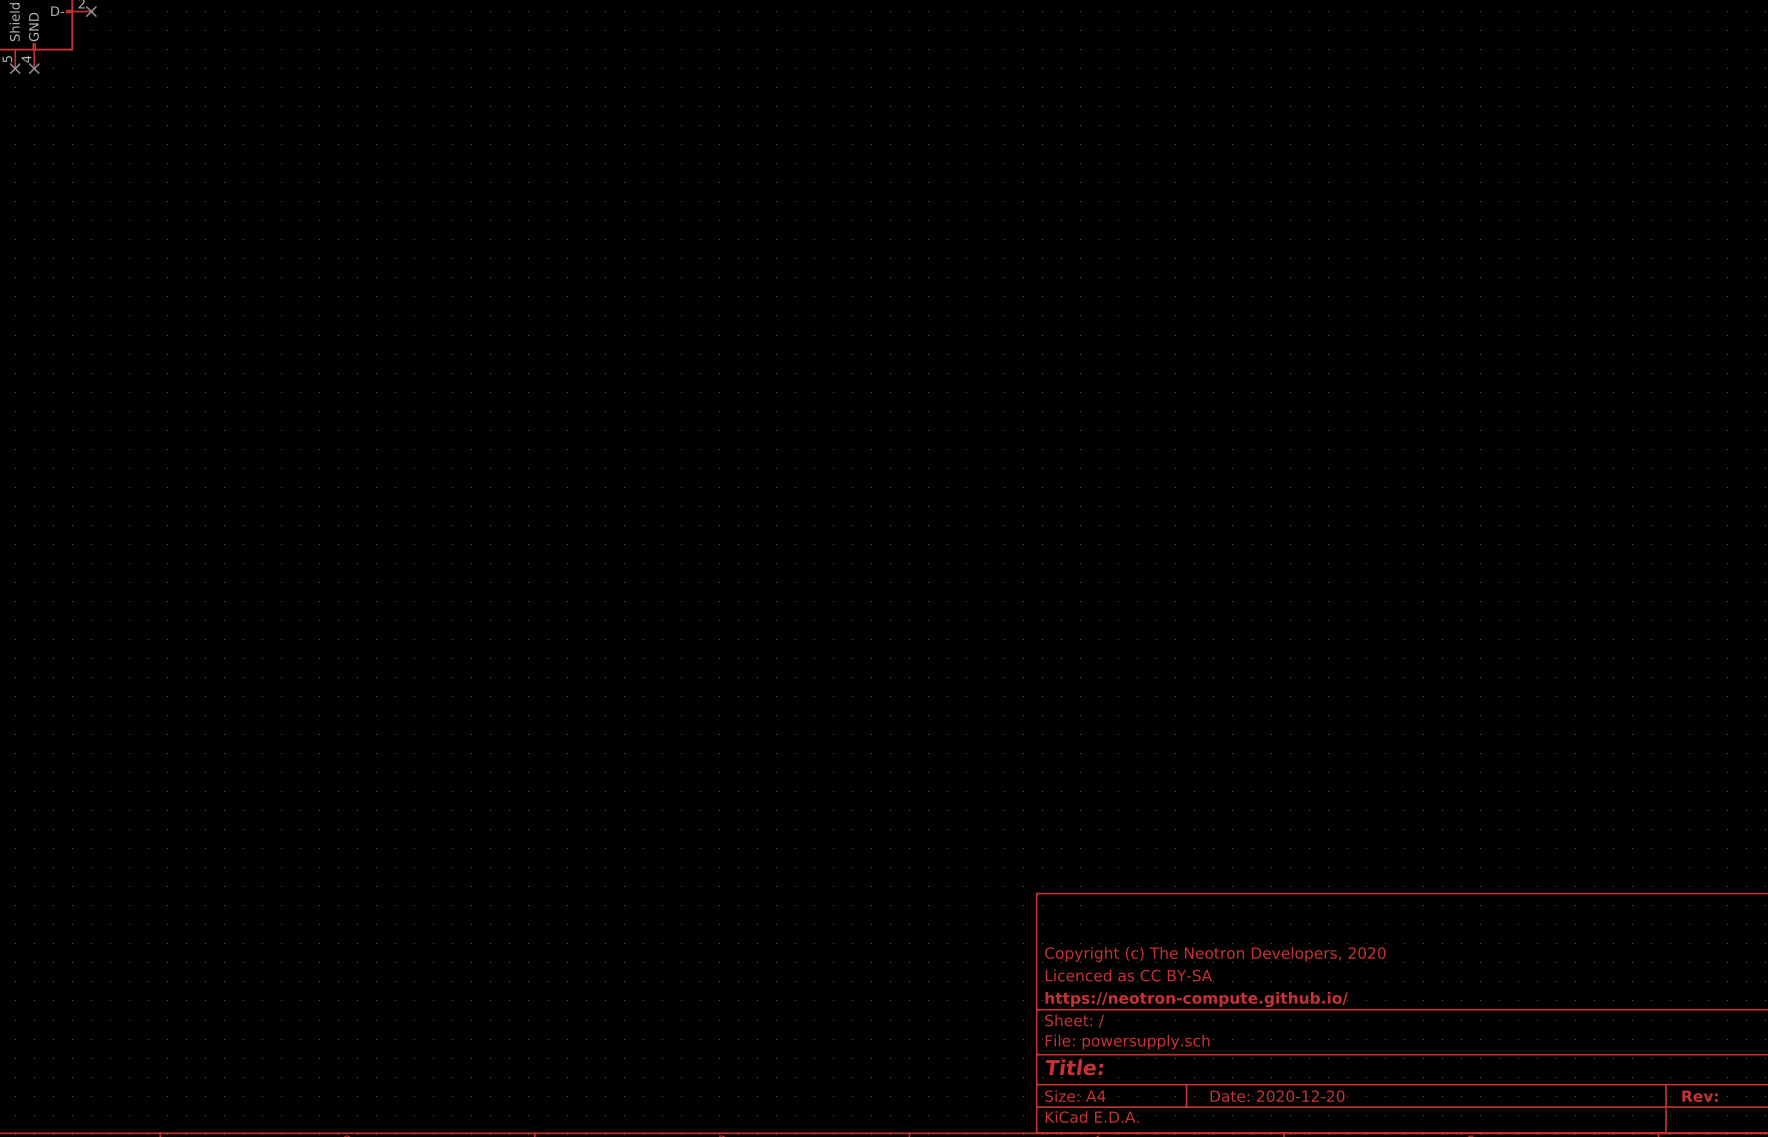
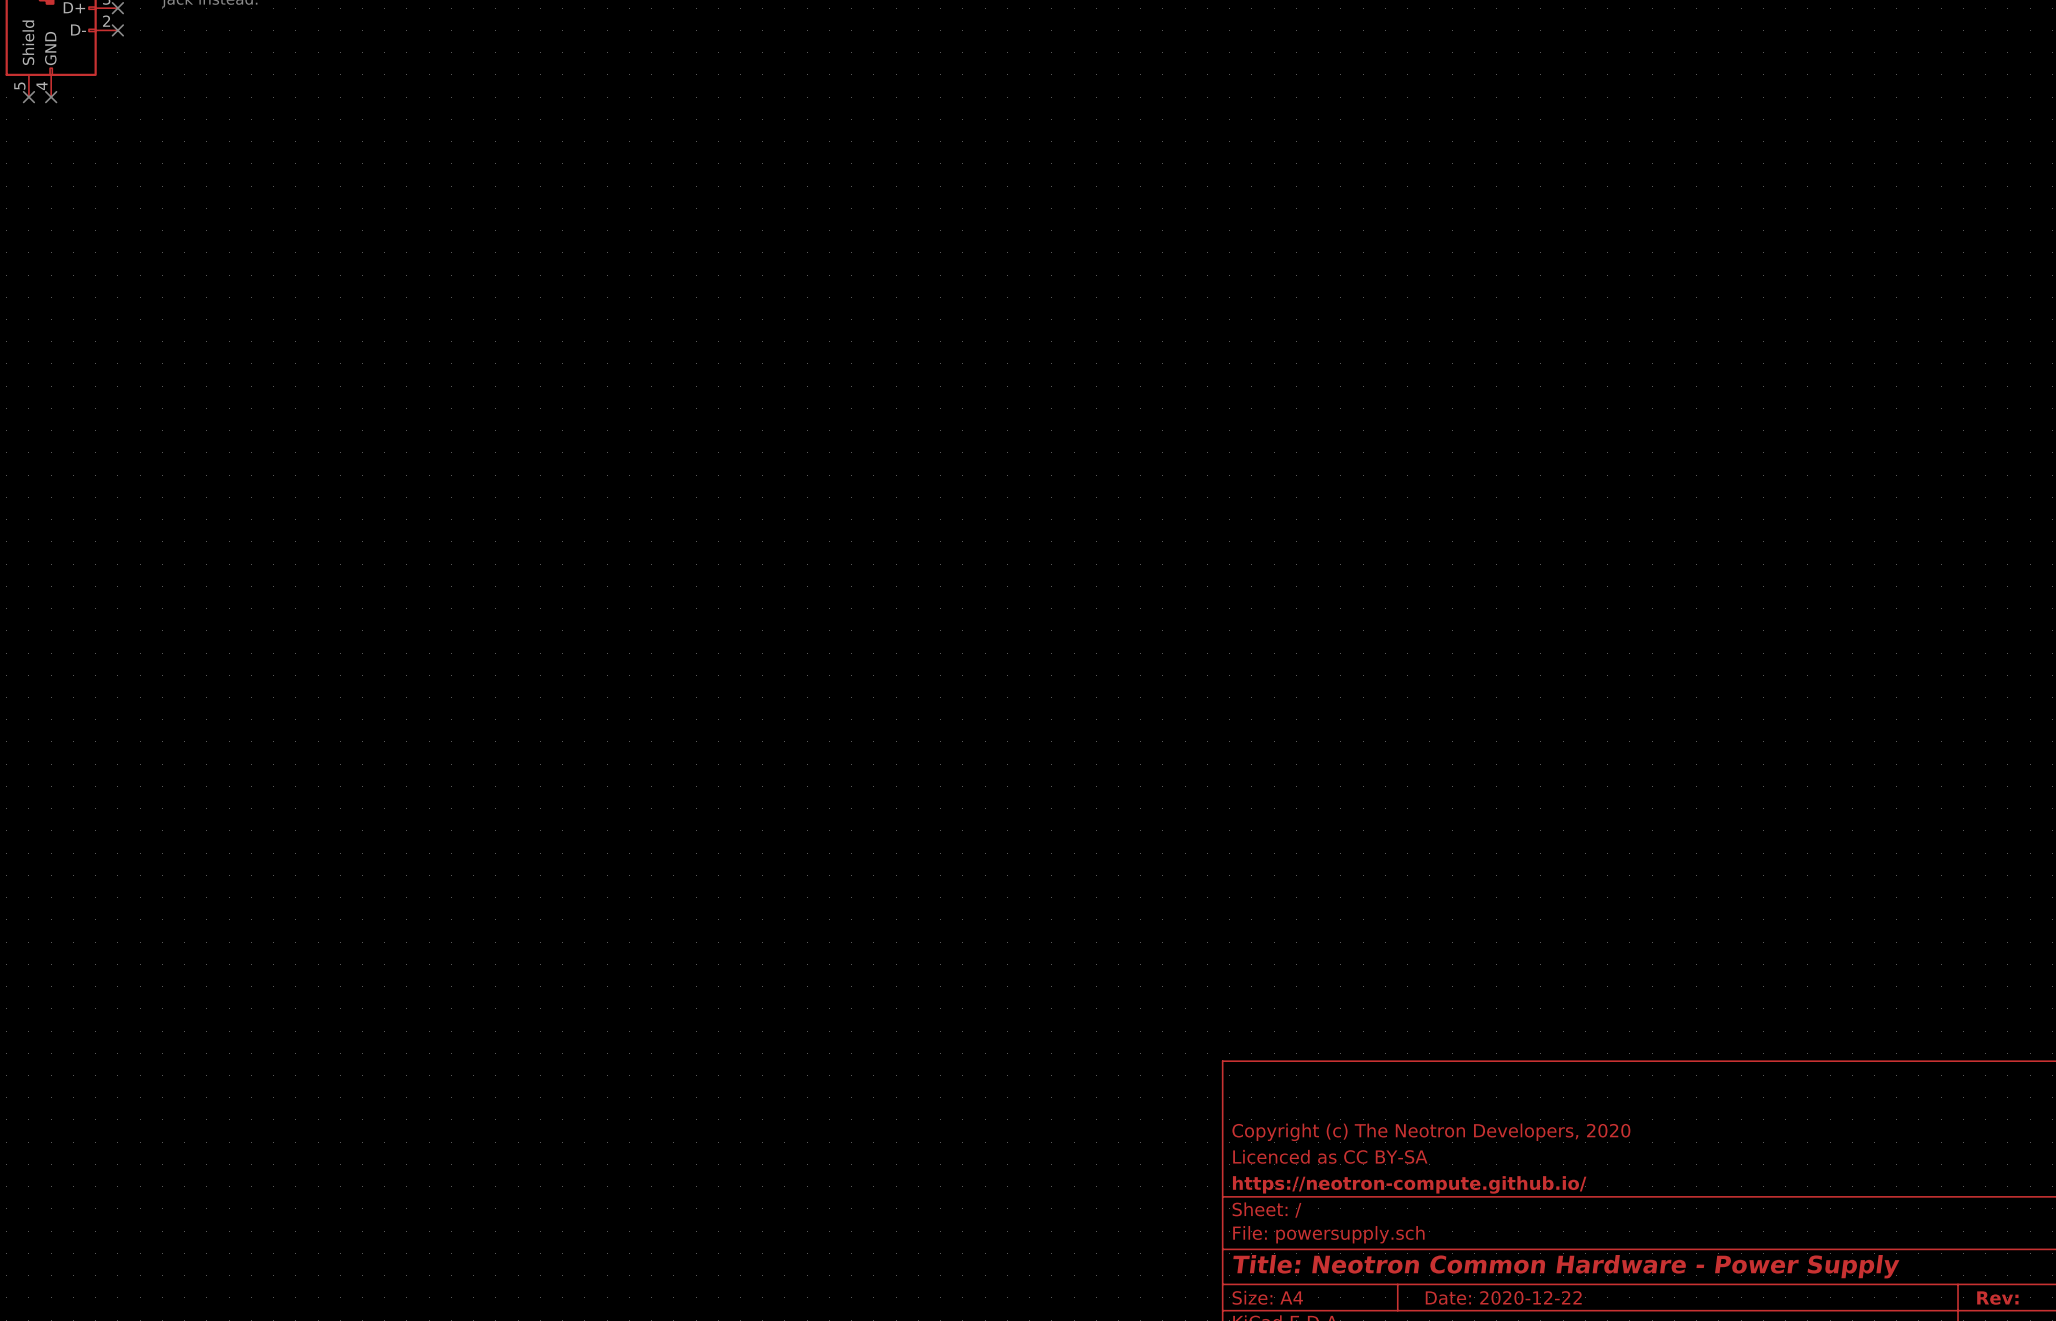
title block: Title: (1074, 1067) -> Title: Neotron Common Hardware - Power Supply (1566, 1266)
title block: Date: 2020-12-20 (1277, 1096) -> Date: 2020-12-22 (1503, 1297)

